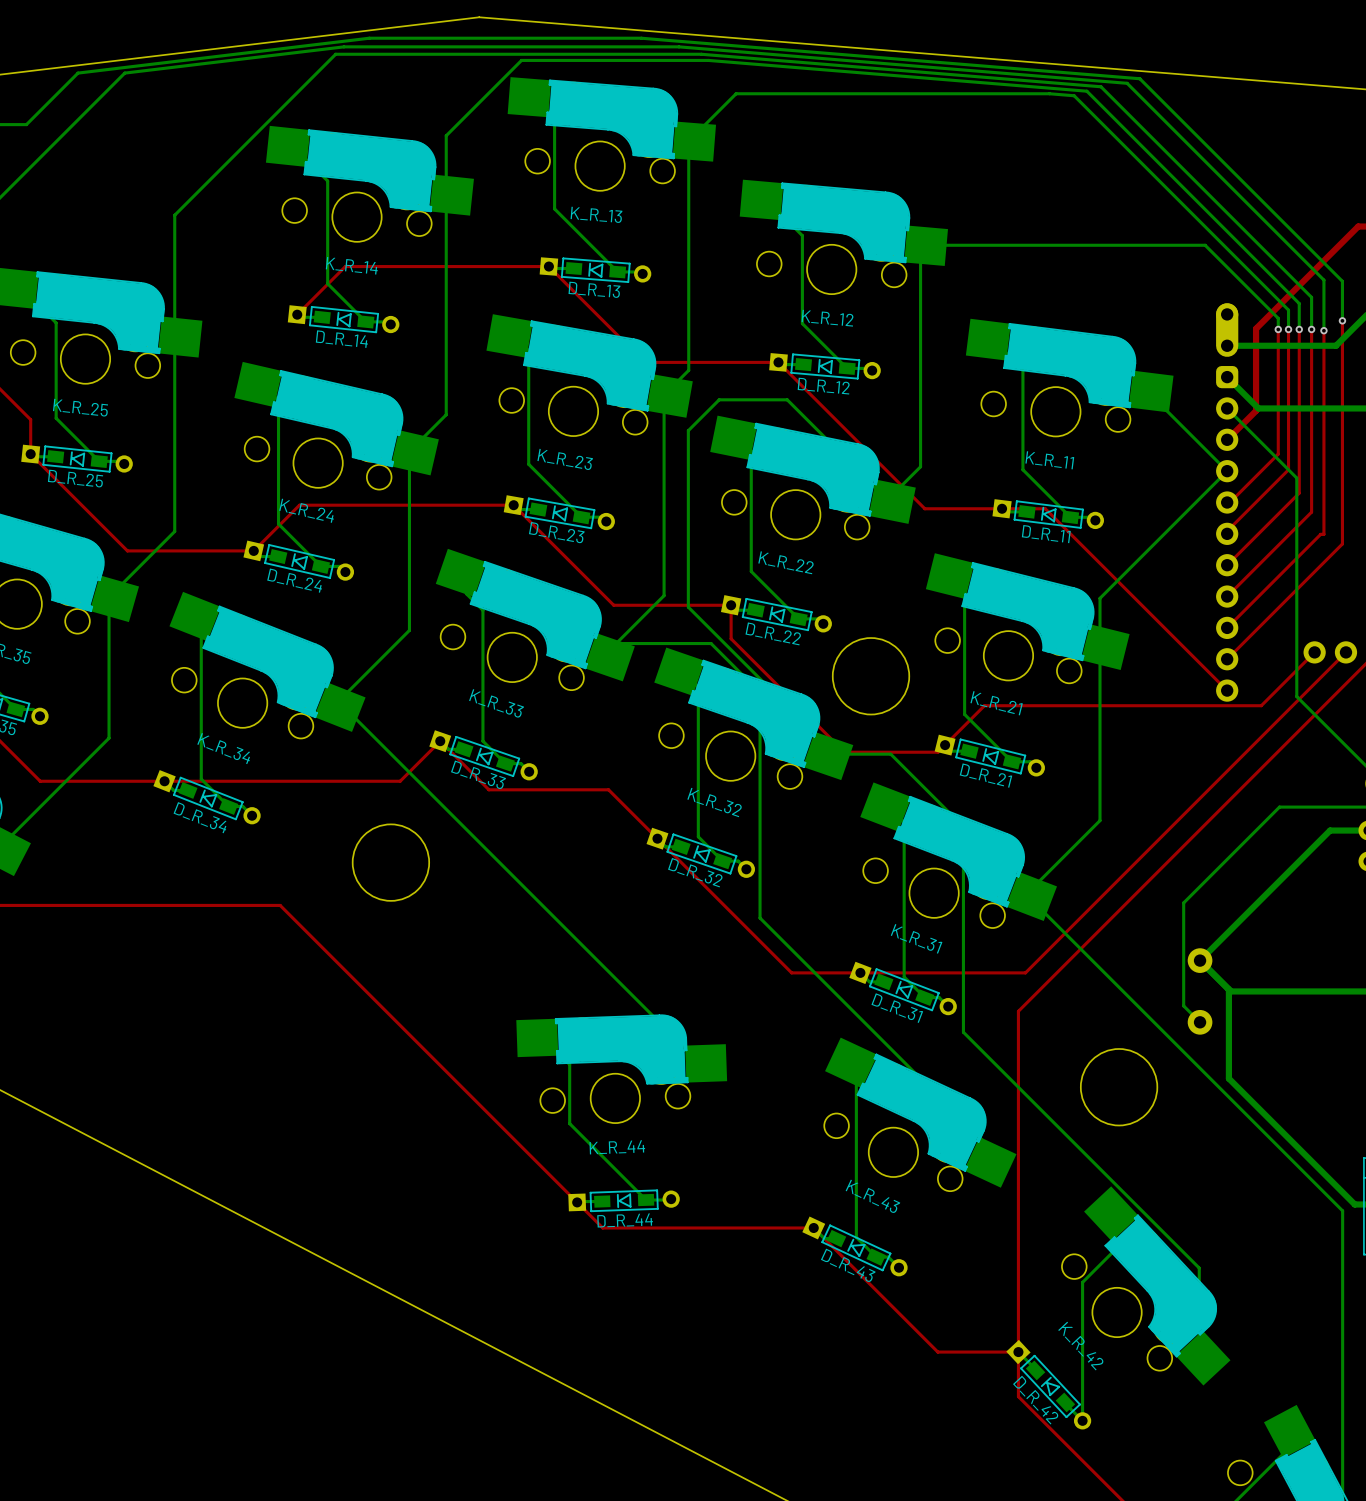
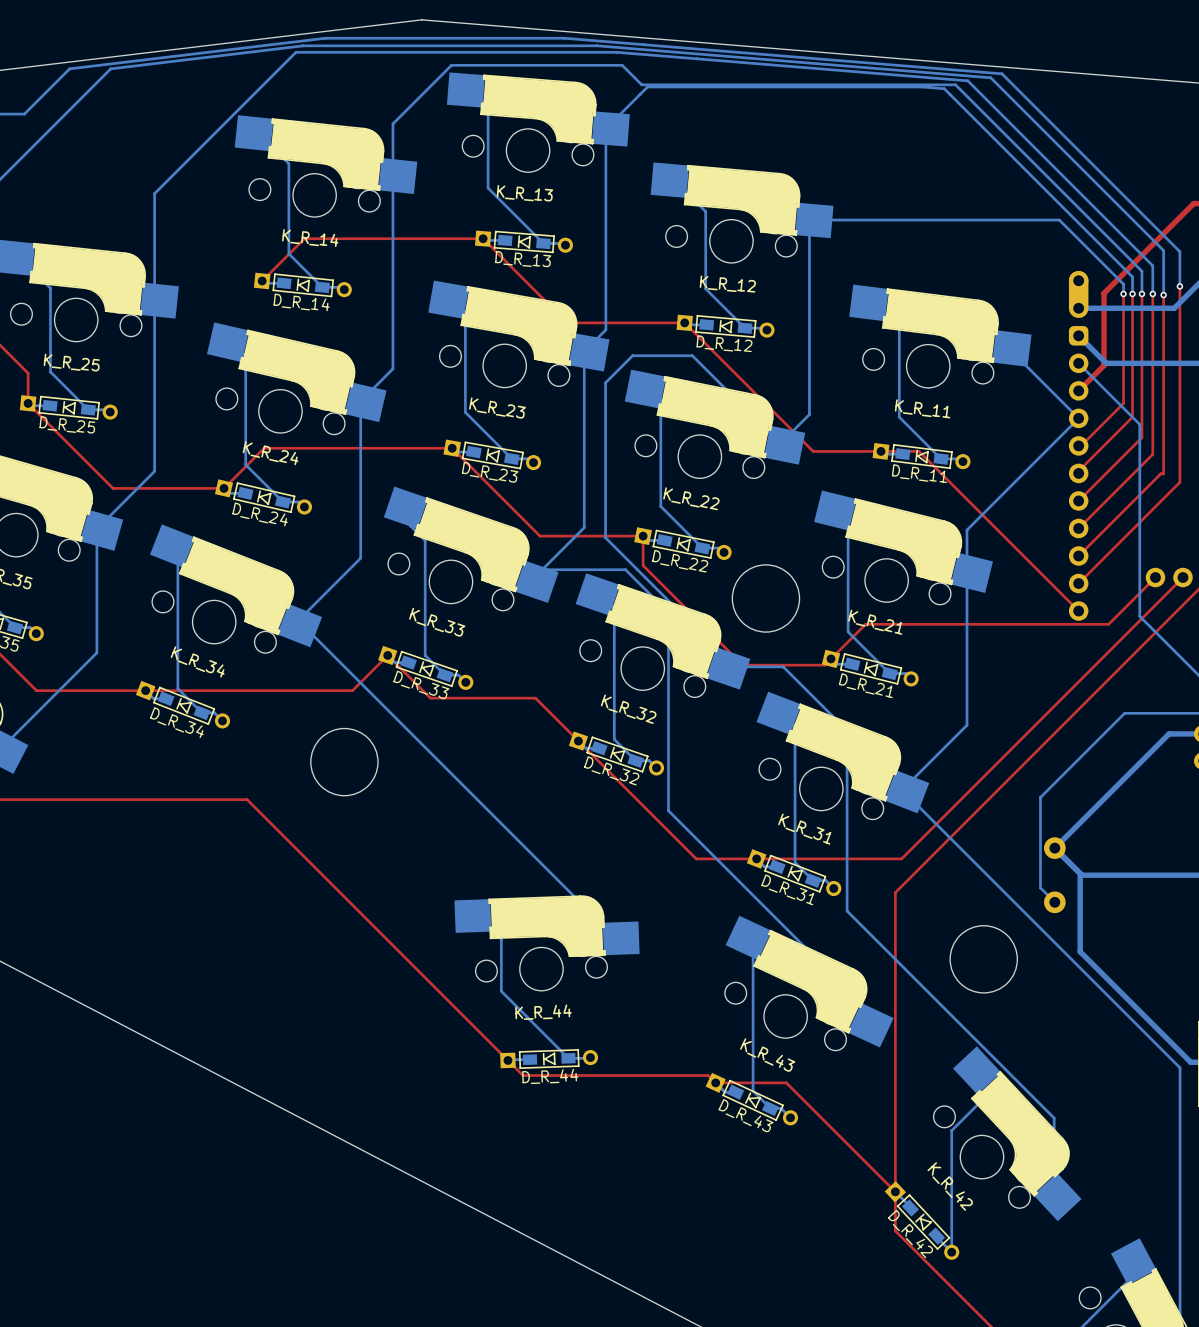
bottom track: (512, 69) (521, 60) (708, 60) (1086, 91) -> (451, 65) (622, 65) (641, 84) (955, 84)
top track: (594, 1219) (602, 1227) (813, 1227) (937, 1352) (1018, 1352) -> (523, 1075) (708, 1075) (715, 1082) (786, 1082) (895, 1191)

